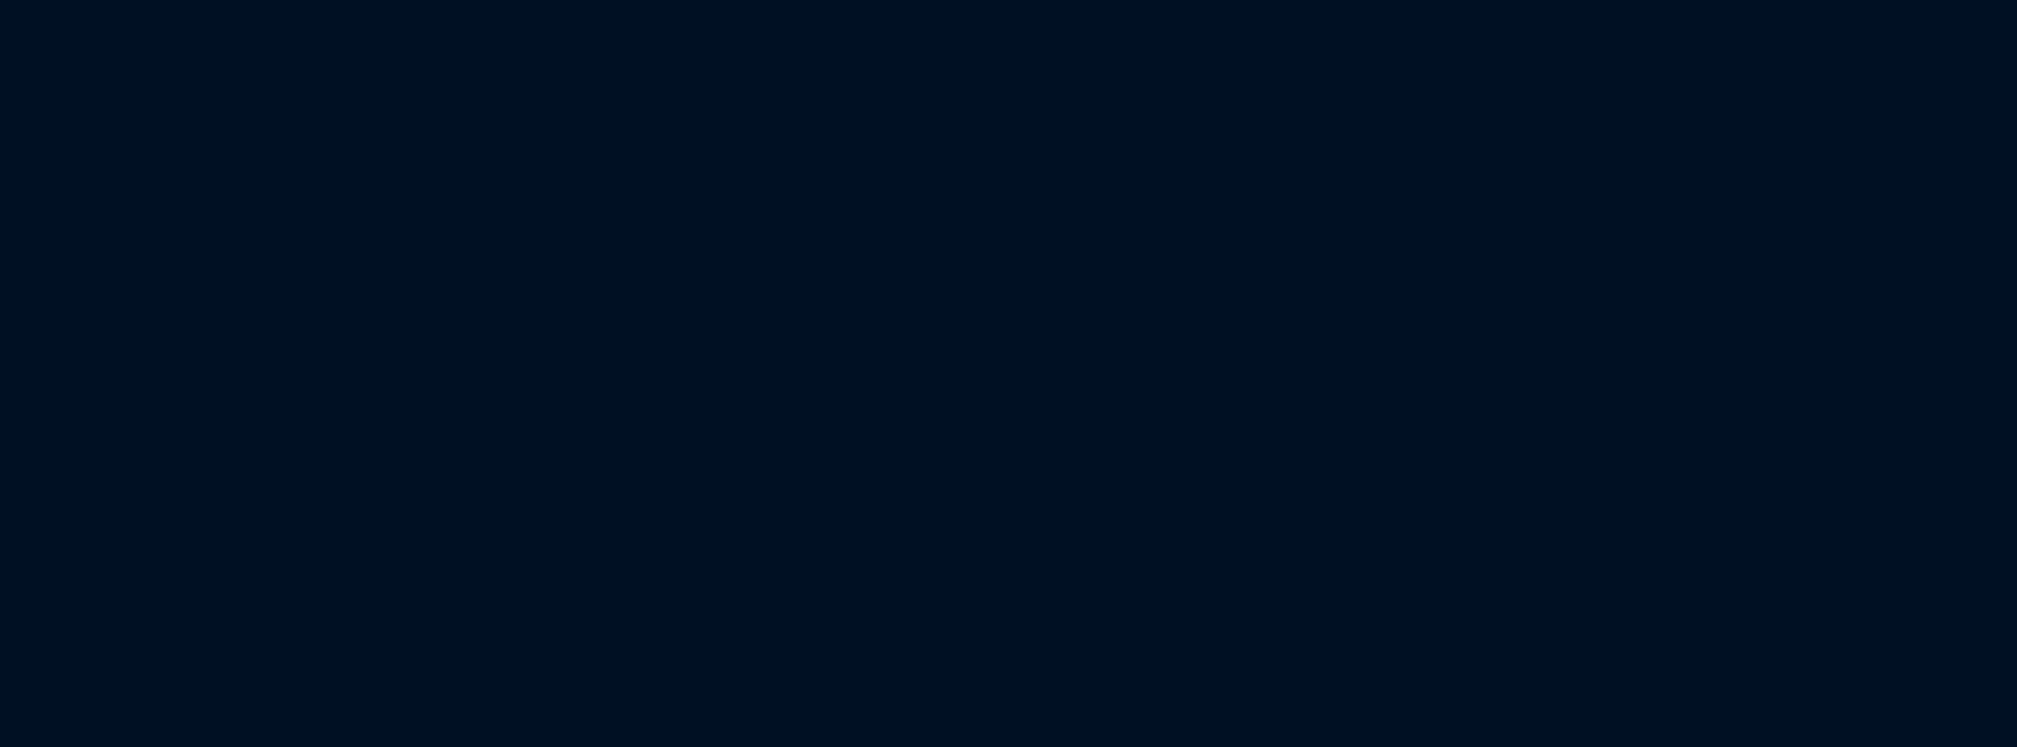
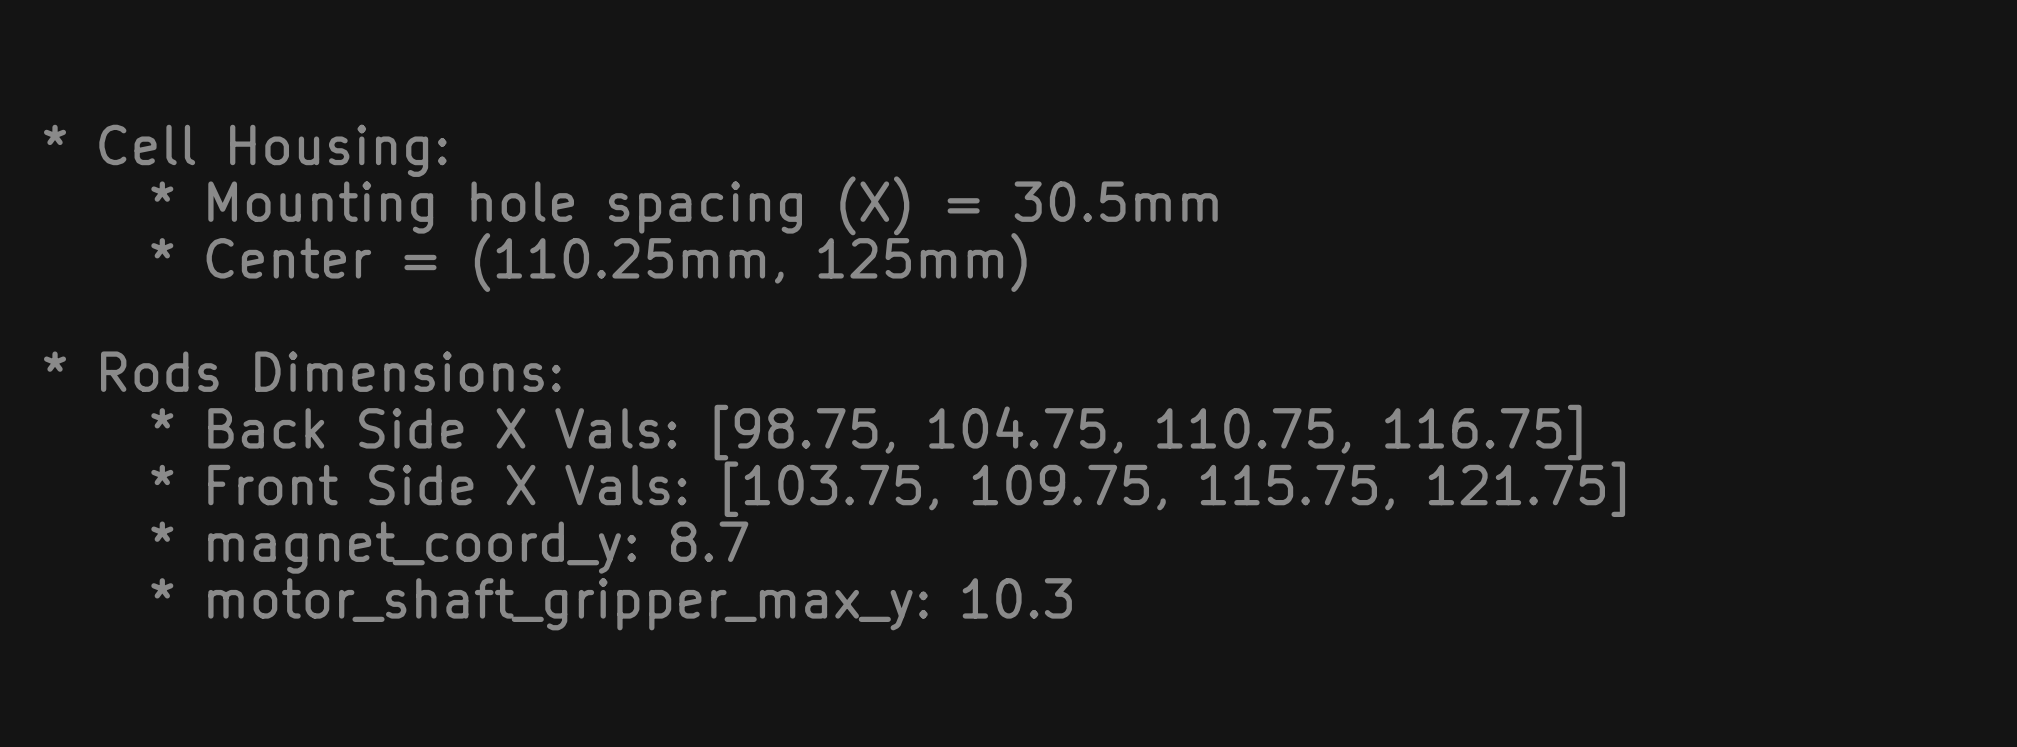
text: none -> * Cell Housing: (245, 150)
text: none -> * Mounting hole spacing (X) = 30.5mm (684, 205)
text: none -> * Center = (110.25mm, 125mm) (588, 262)
text: none -> * Rods Dimensions: (302, 371)
text: none -> * Back Side X Vals: [98.75, 104.75, 110.75, 116.75] (866, 432)
text: none -> * Front Side X Vals: [103.75, 109.75, 115.75, 121.75] (888, 489)
text: none -> * magnet_coord_y: 8.7 (449, 547)
text: none -> * motor_shaft_gripper_max_y: 10.3 (611, 604)

